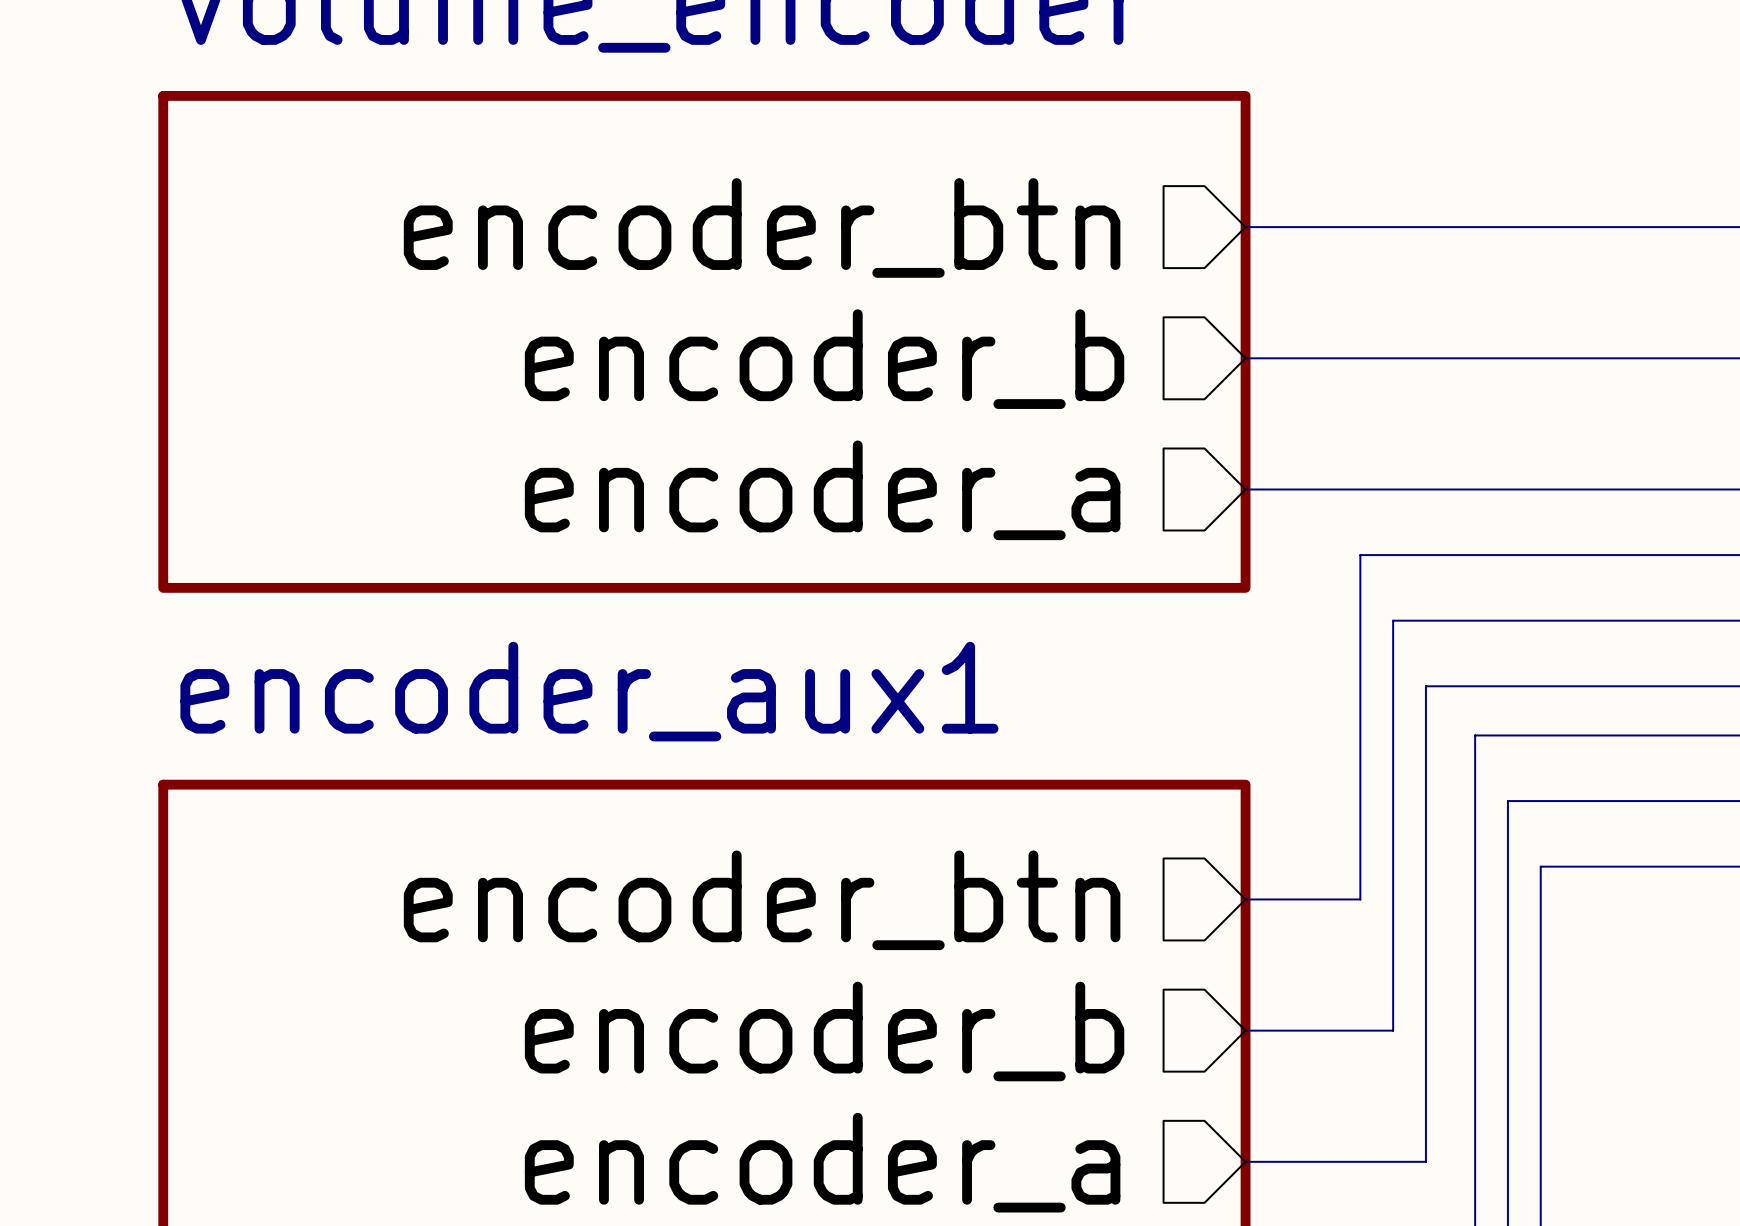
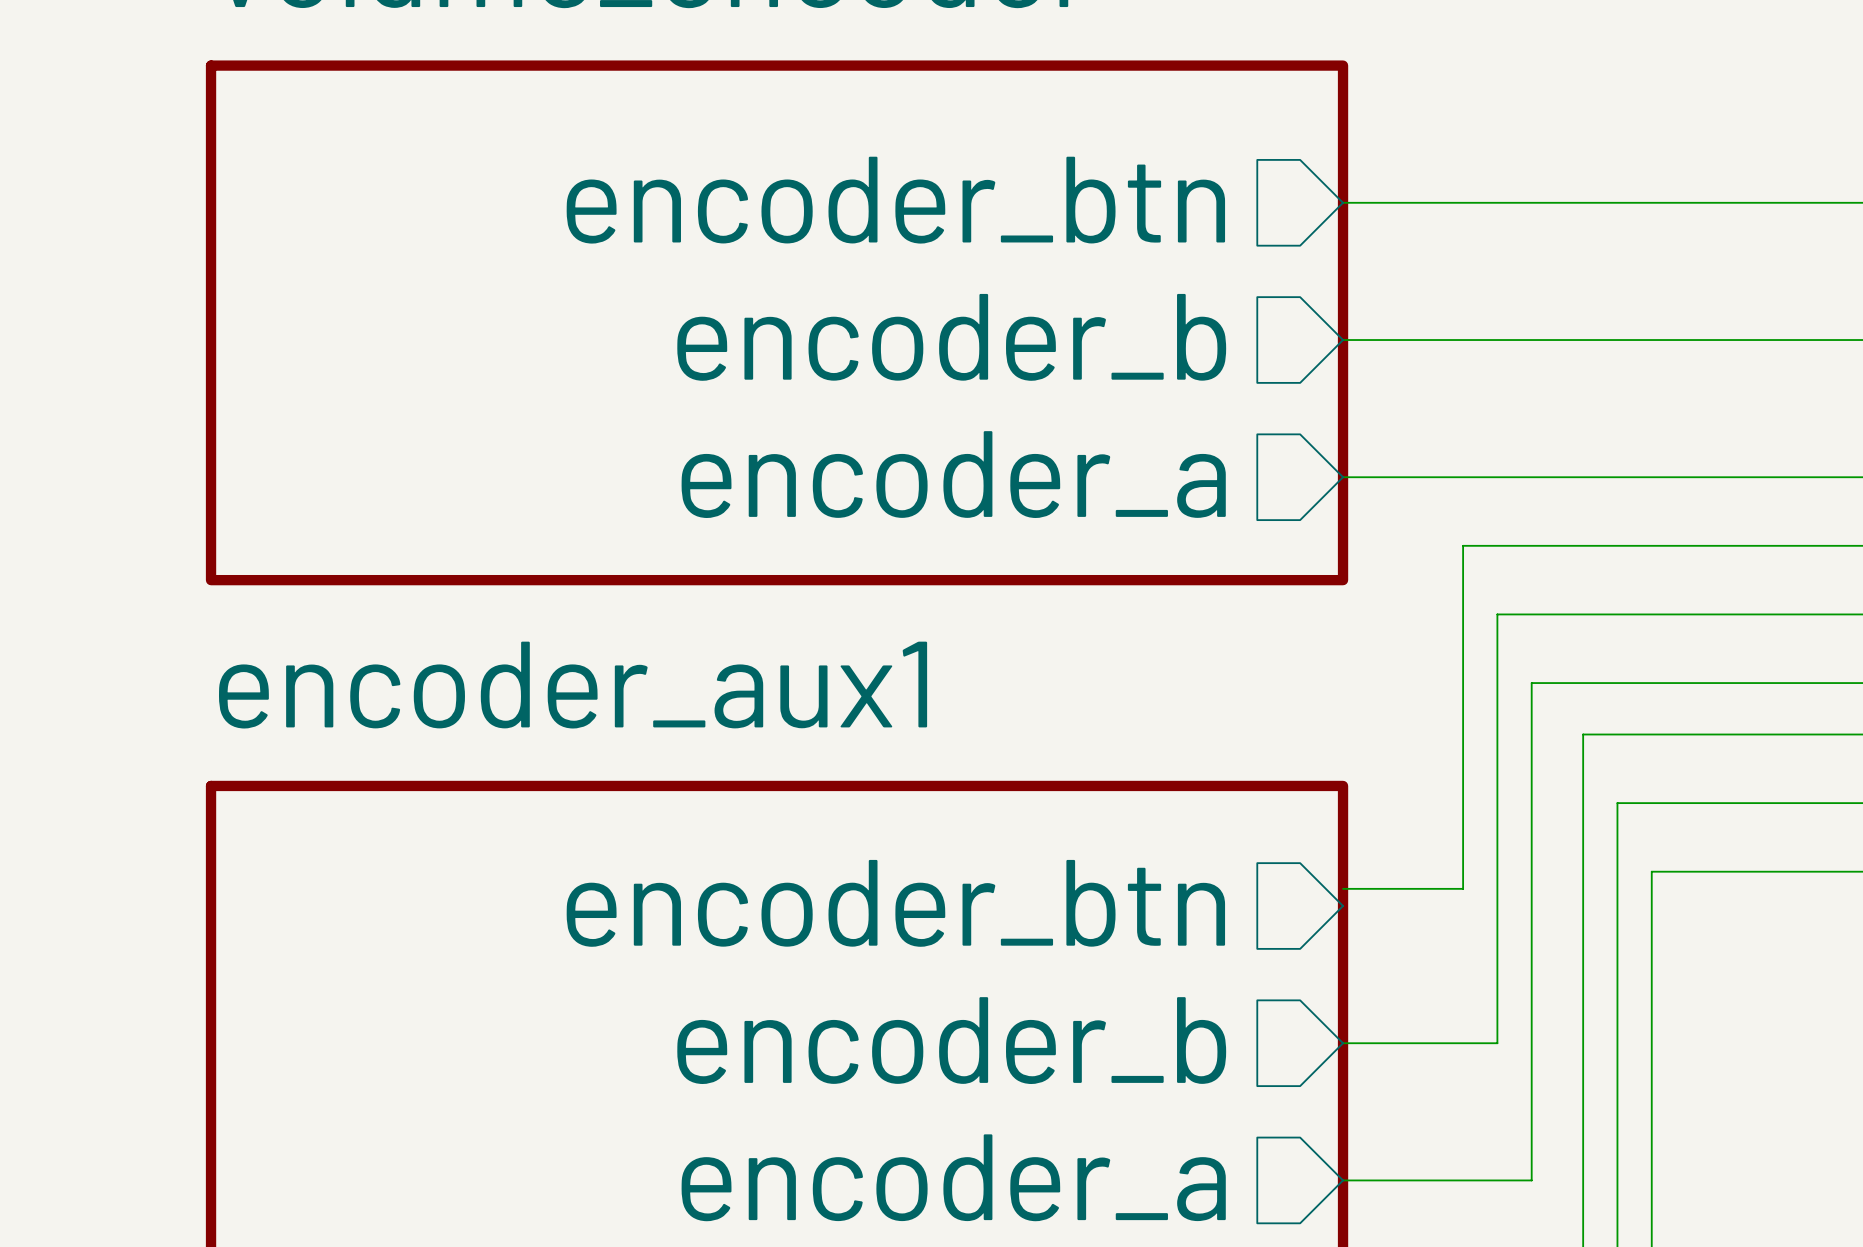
wire: (1360, 883) (1360, 899) (1245, 899) -> (1463, 888) (1343, 888)

